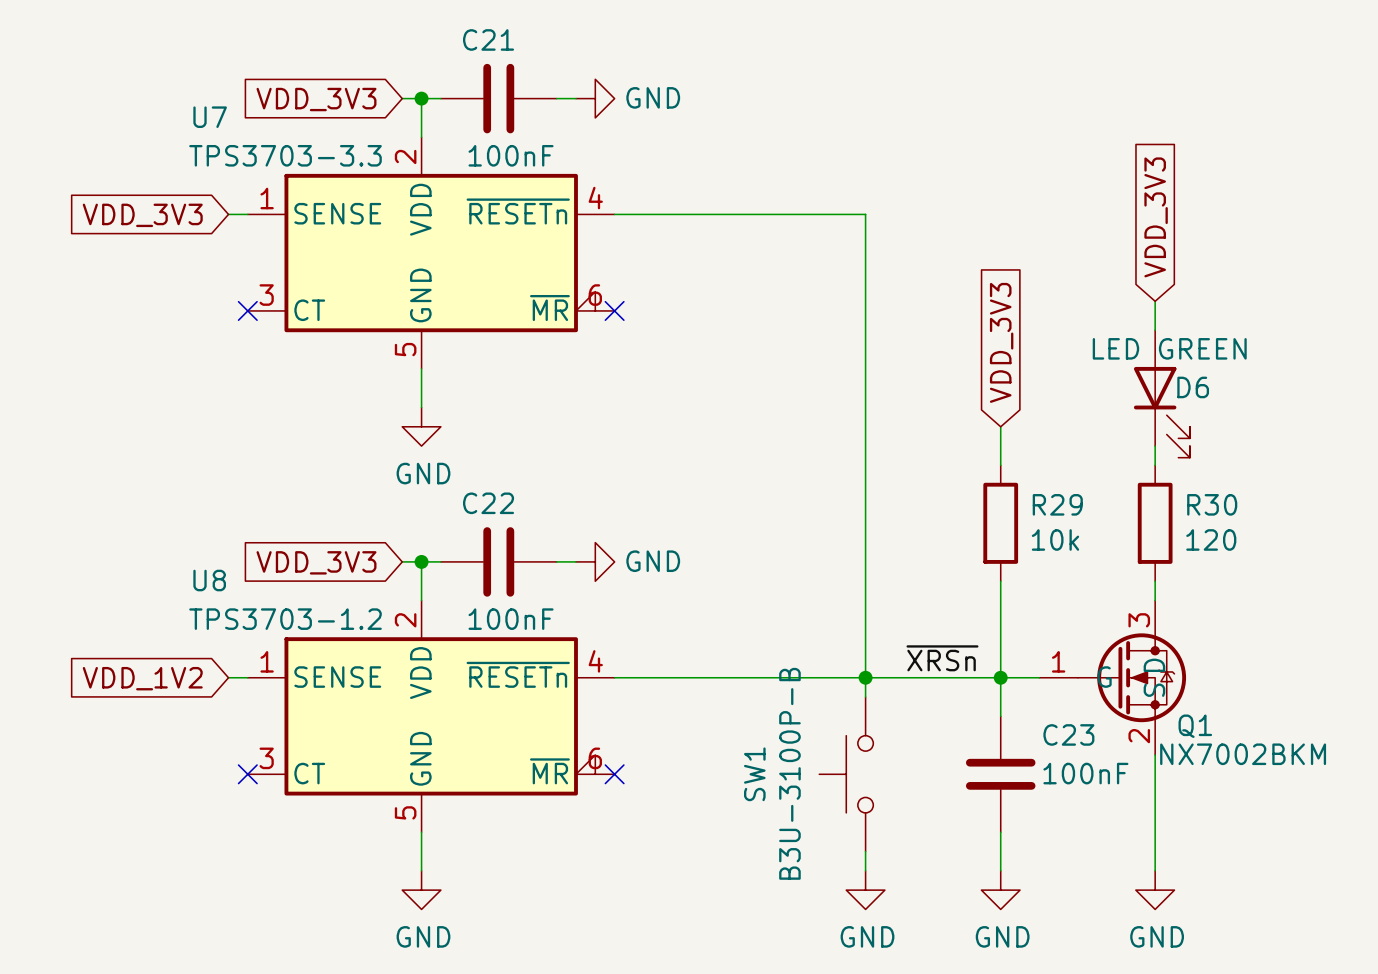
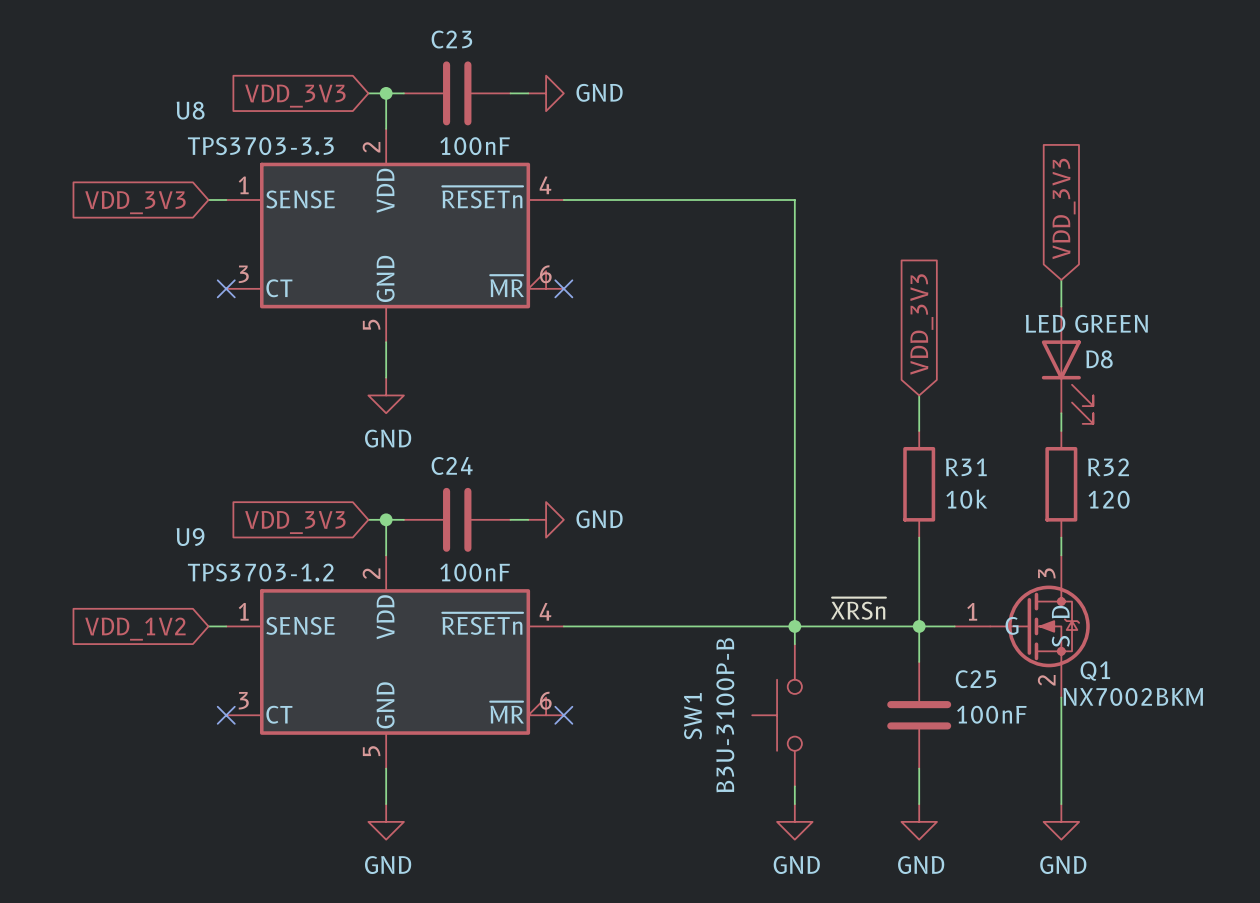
C21 name: C21 (488, 39) -> C23 (451, 39)
U7 name: U7 (210, 117) -> U8 (190, 110)
D6 name: D6 (1193, 387) -> D8 (1099, 359)
C22 name: C22 (488, 503) -> C24 (452, 465)
R29 name: R29 (1057, 504) -> R31 (966, 467)
R30 name: R30 (1212, 504) -> R32 (1108, 467)
U8 name: U8 (209, 580) -> U9 (190, 537)
C23 name: C23 (1068, 734) -> C25 (976, 679)

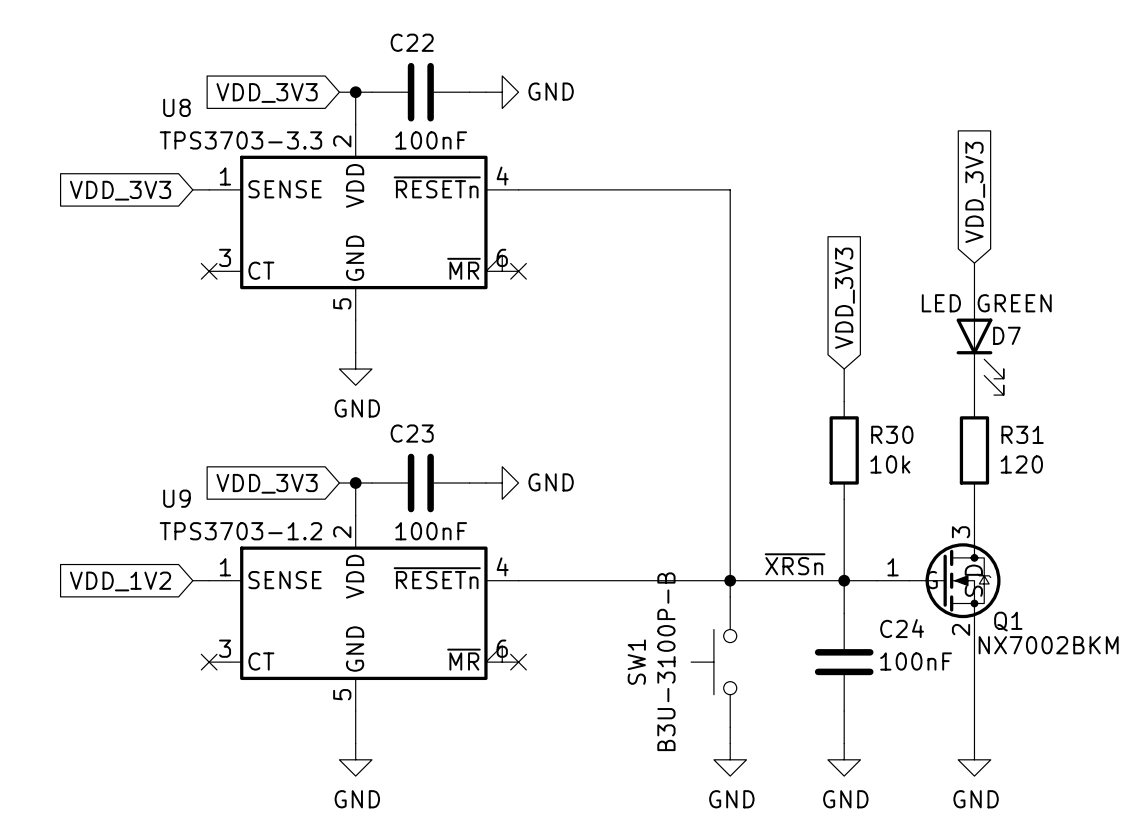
C23 name: C23 (451, 39) -> C22 (412, 42)
D8 name: D8 (1099, 359) -> D7 (1006, 335)
C24 name: C24 (452, 465) -> C23 (412, 433)
R31 name: R31 (966, 467) -> R30 (892, 434)
R32 name: R32 (1108, 467) -> R31 (1022, 434)
C25 name: C25 (976, 679) -> C24 (902, 628)

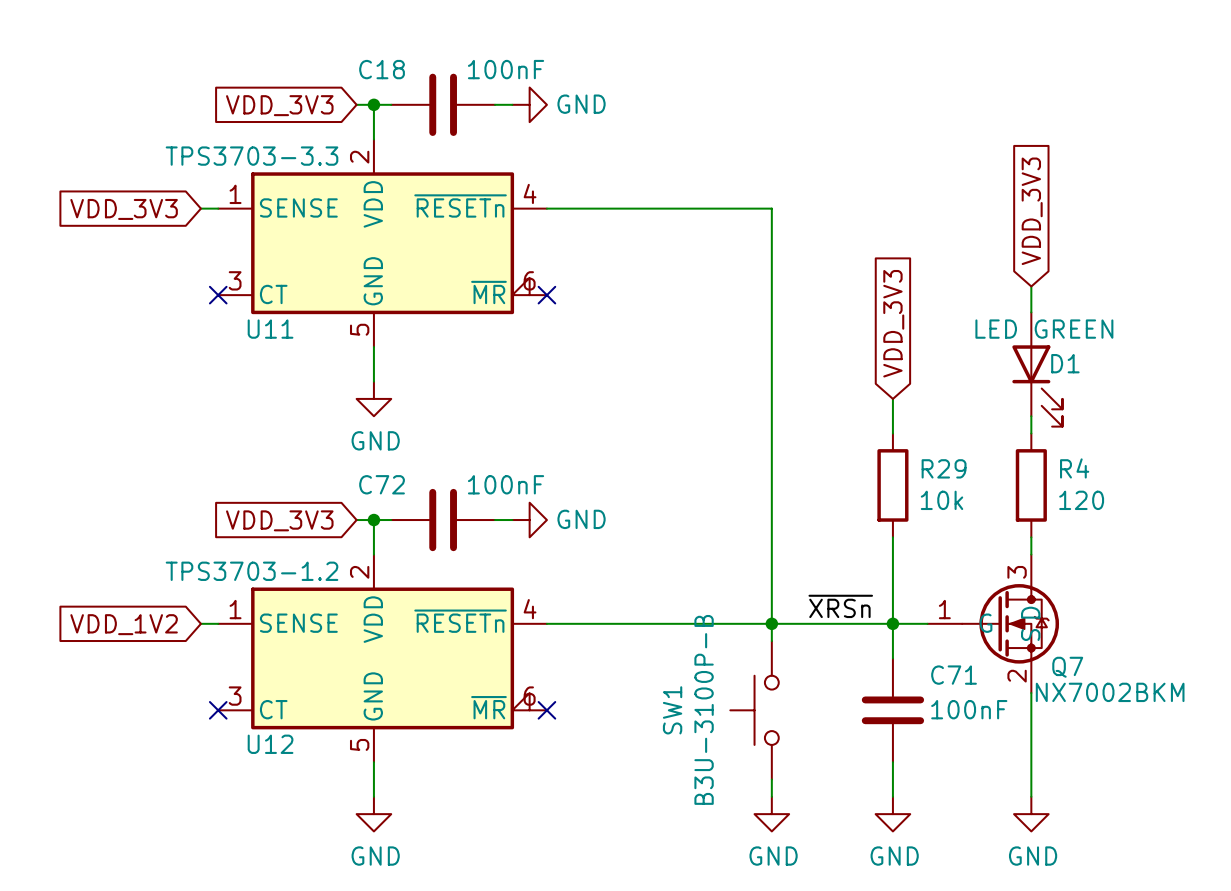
C22 name: C22 (412, 42) -> C18 (382, 69)
U8 name: U8 (176, 107) -> U11 (270, 329)
C22 value position: 100nF (431, 140) -> 100nF (506, 69)
D7 name: D7 (1006, 335) -> D1 (1065, 363)
C23 name: C23 (412, 433) -> C72 (382, 484)
R30 name: R30 (892, 434) -> R29 (944, 468)
R31 name: R31 (1022, 434) -> R4 (1074, 468)
U9 name: U9 (176, 498) -> U12 (270, 744)
C23 value position: 100nF (431, 531) -> 100nF (506, 484)
Q1 name: Q1 (1008, 621) -> Q7 (1067, 667)
C24 name: C24 (902, 628) -> C71 (954, 675)

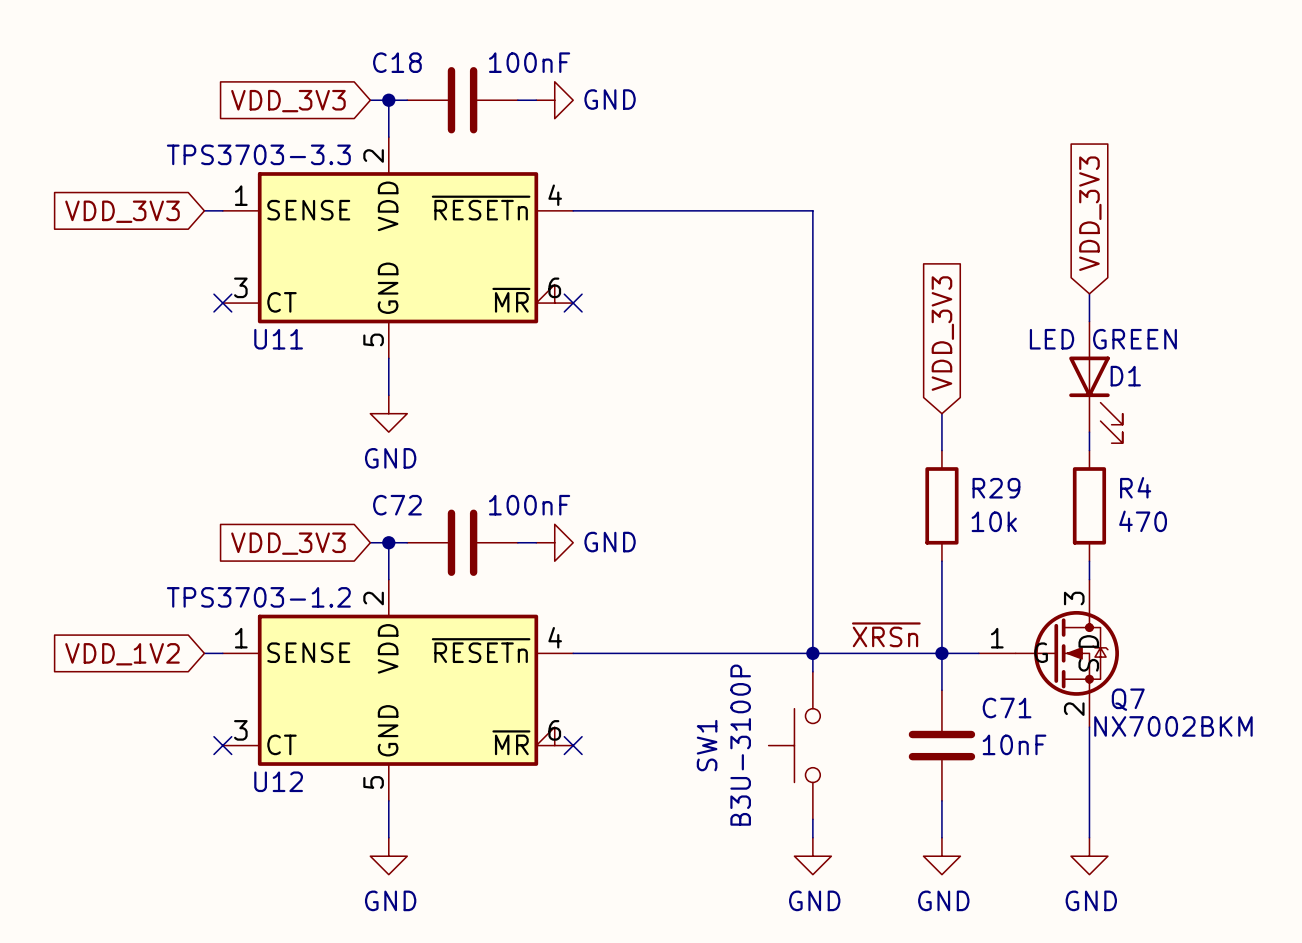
R4 value: 120 (1081, 500) -> 470 (1143, 521)
SW1 value: B3U-3100P-B (704, 709) -> B3U-3100P (740, 745)
C71 value: 100nF (969, 709) -> 10nF (1014, 744)

